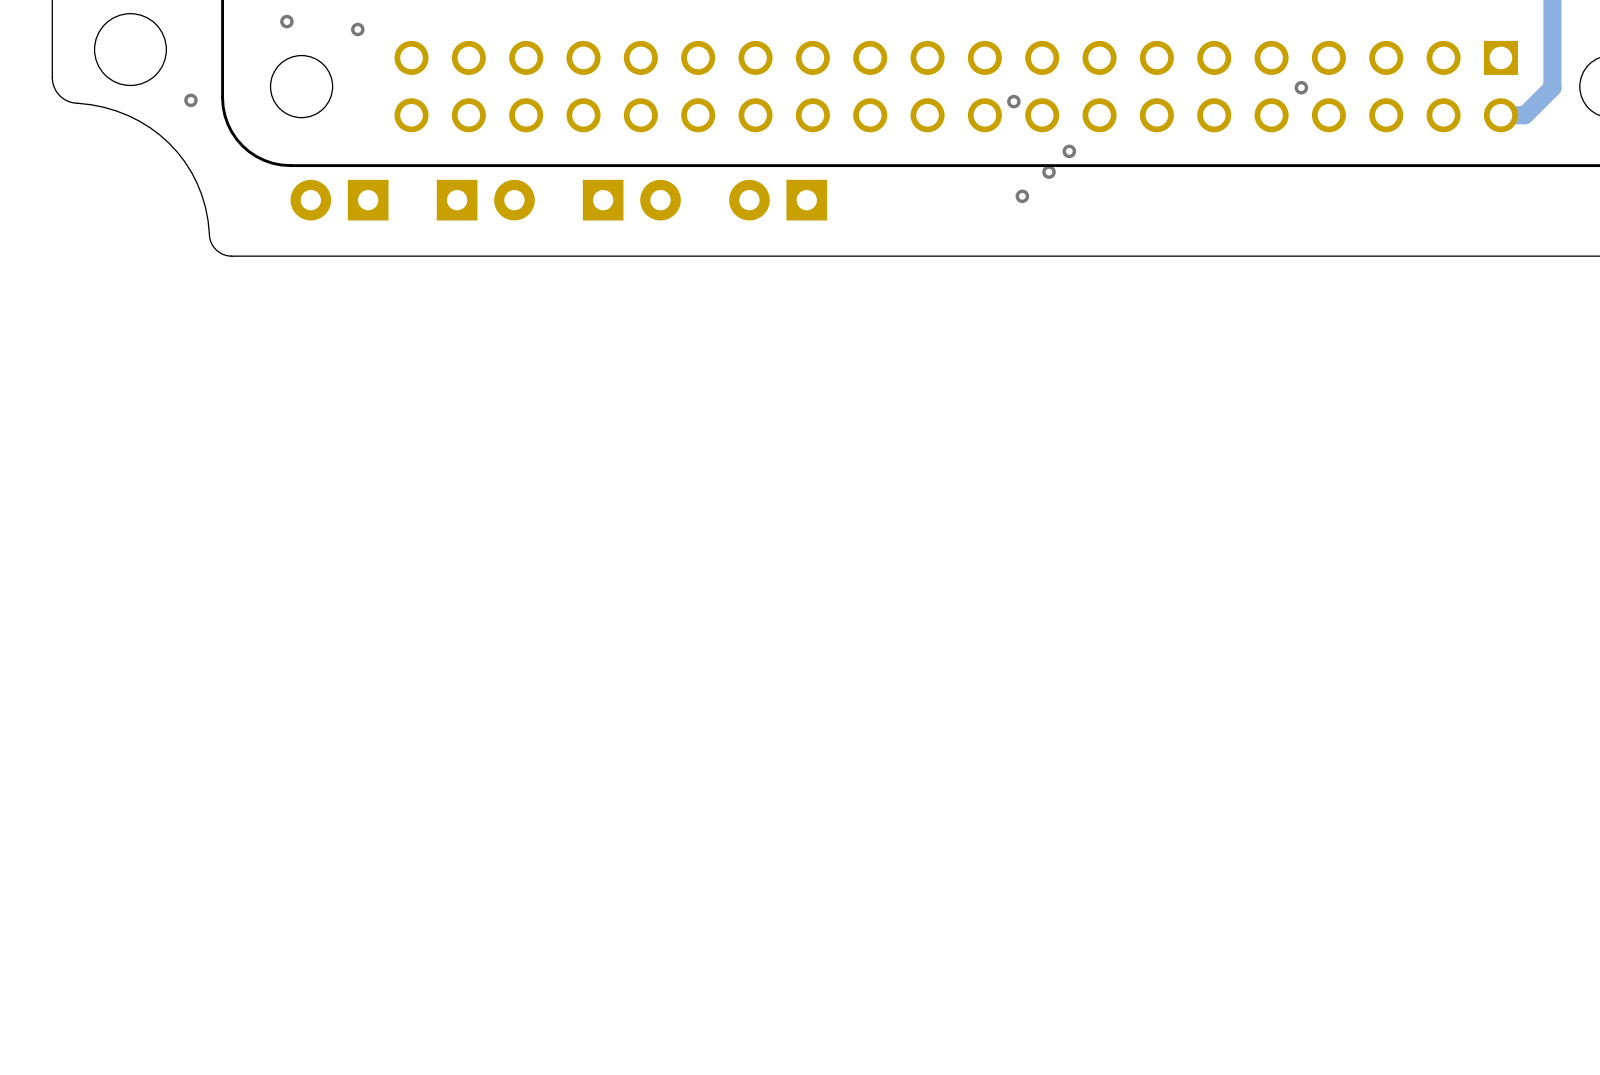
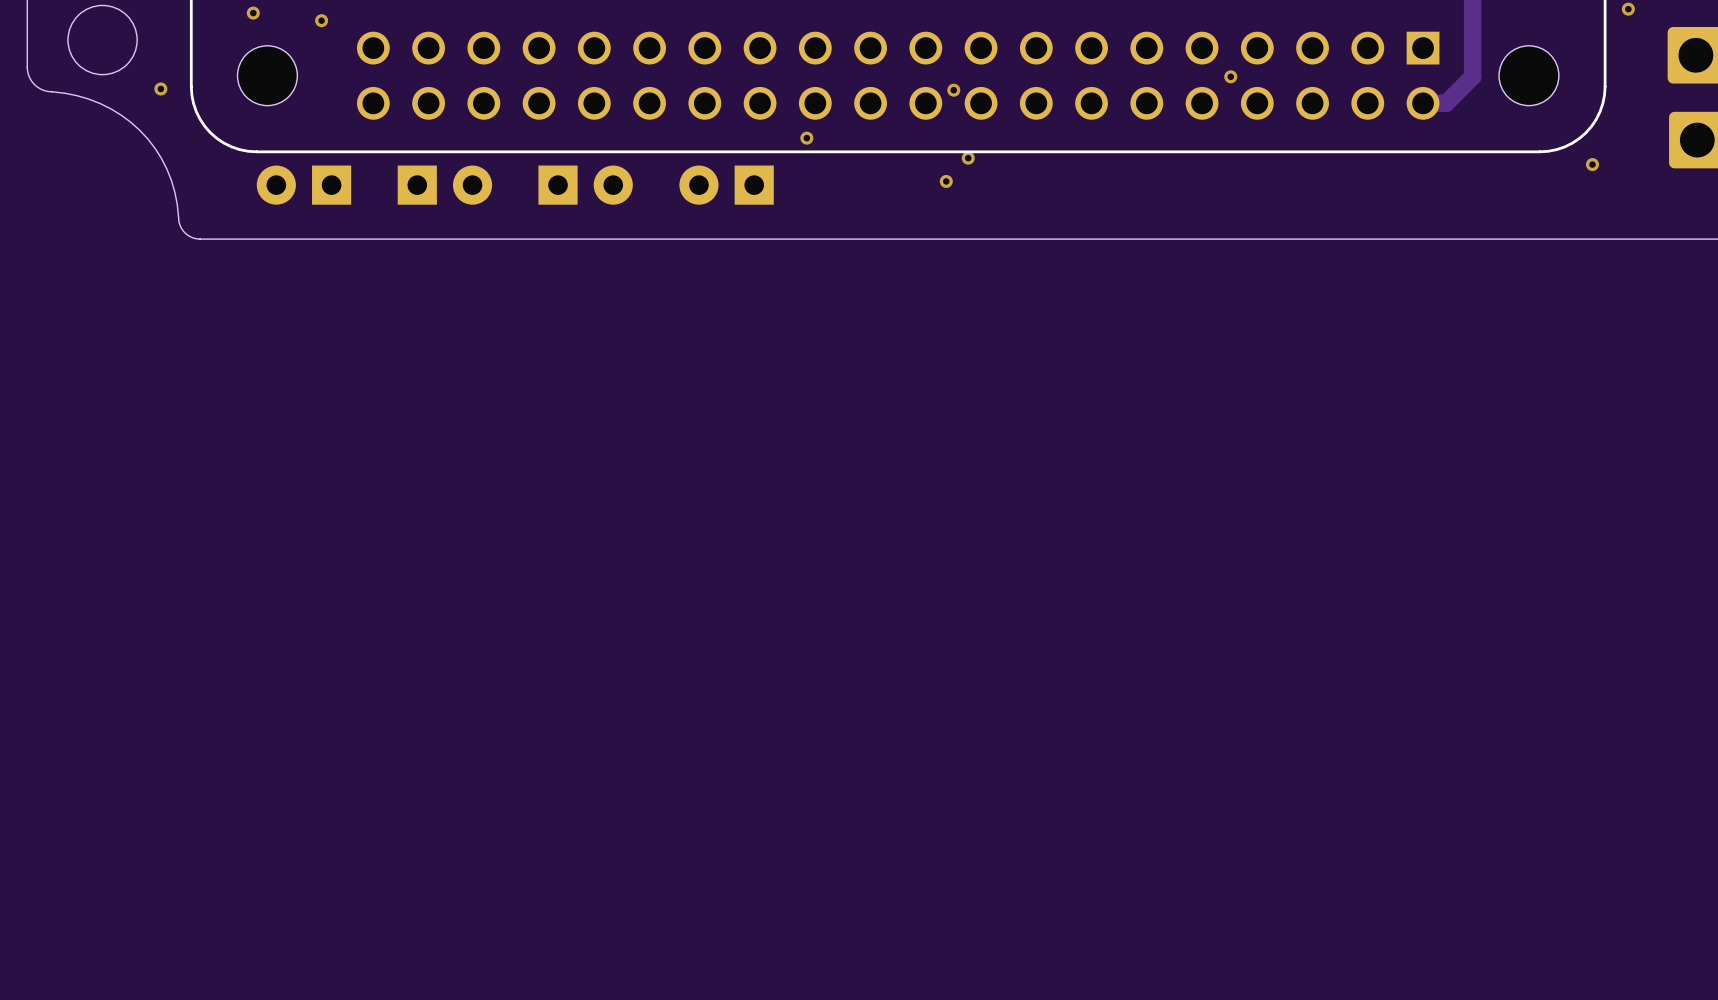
via: none -> (806, 138)
via: (1069, 151) -> none
via: none -> (968, 158)
via: (1049, 172) -> none
via: none -> (946, 181)
via: (1022, 196) -> none

